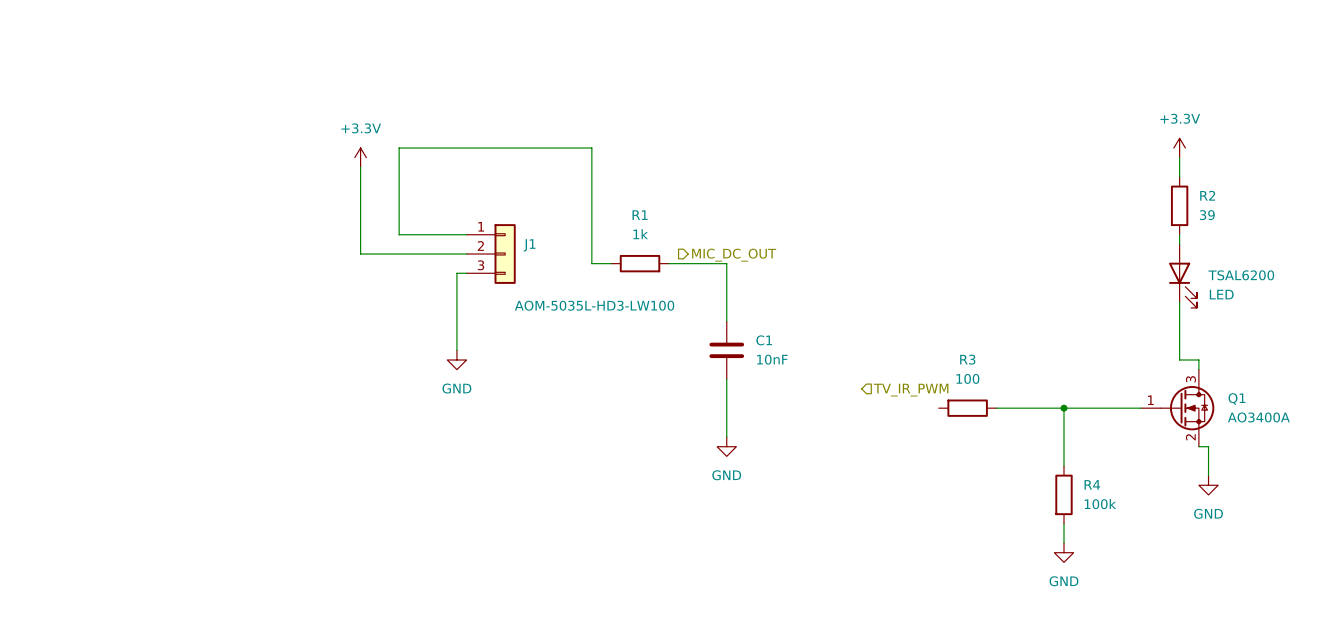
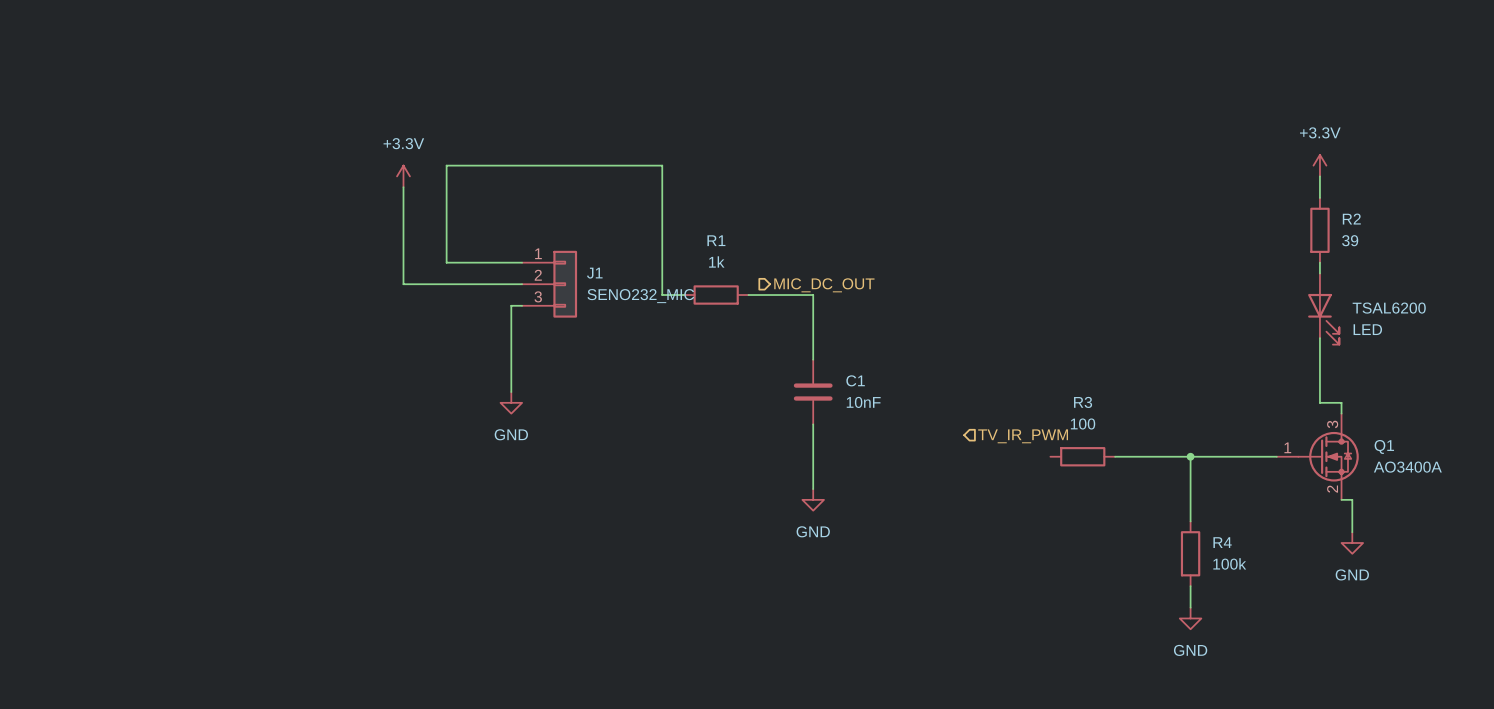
J1 value: AOM-5035L-HD3-LW100 (594, 305) -> SENO232_MIC (640, 296)

